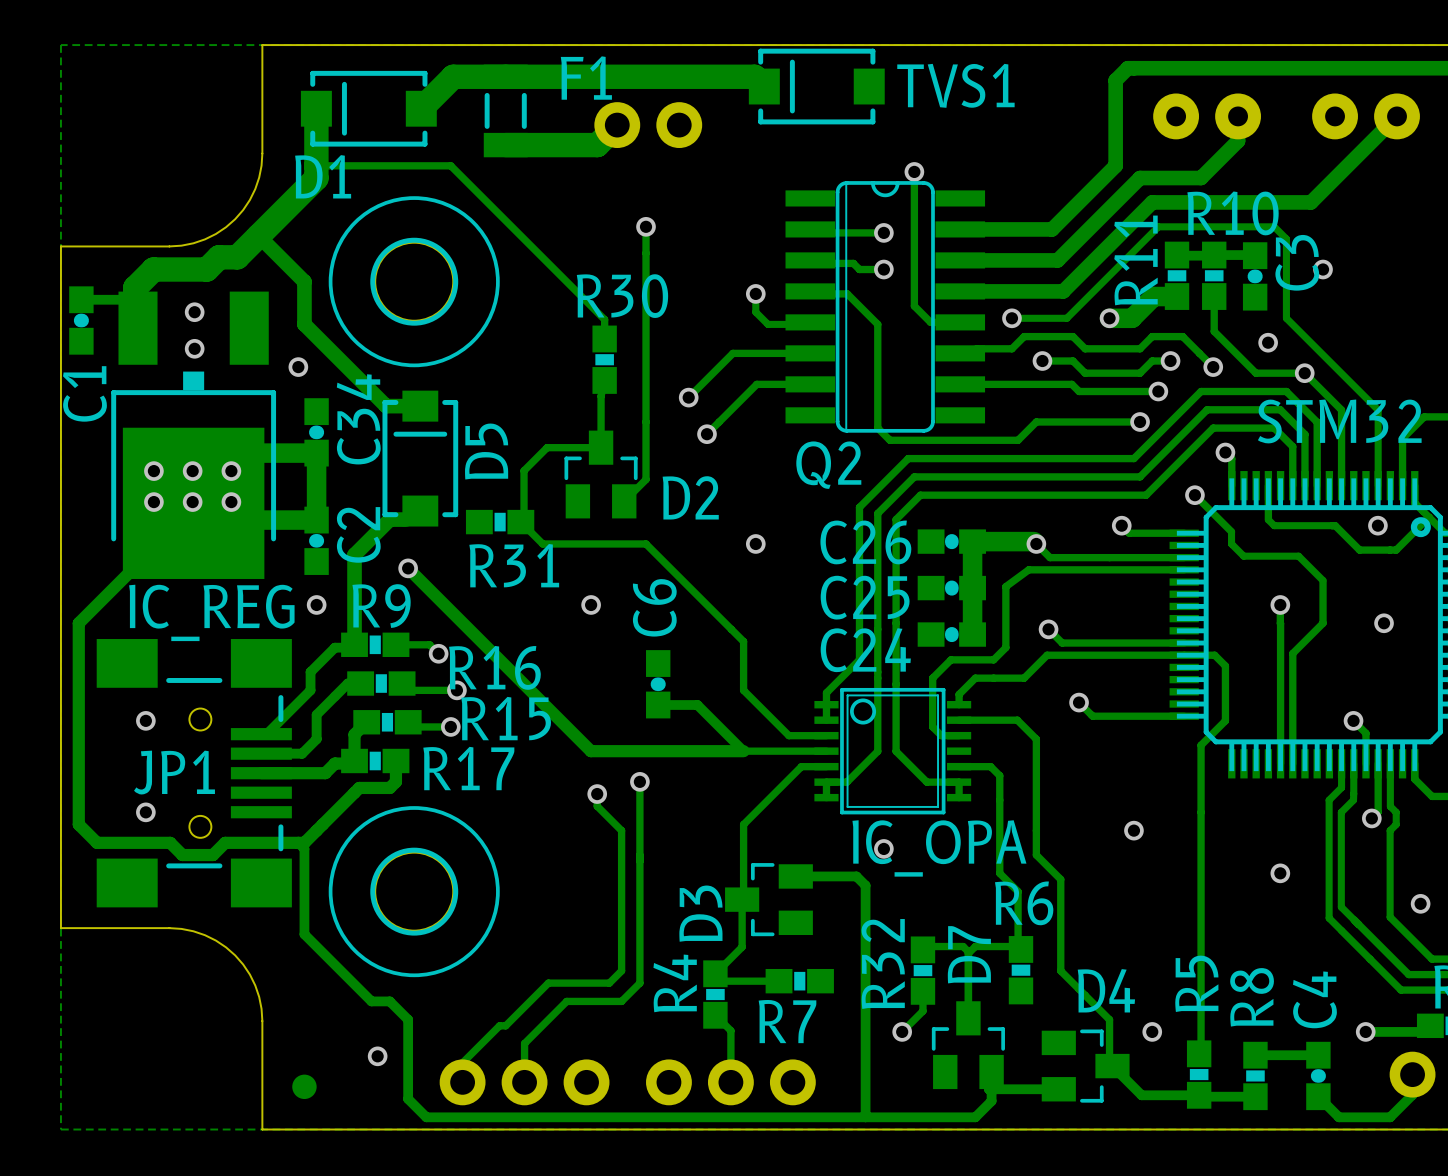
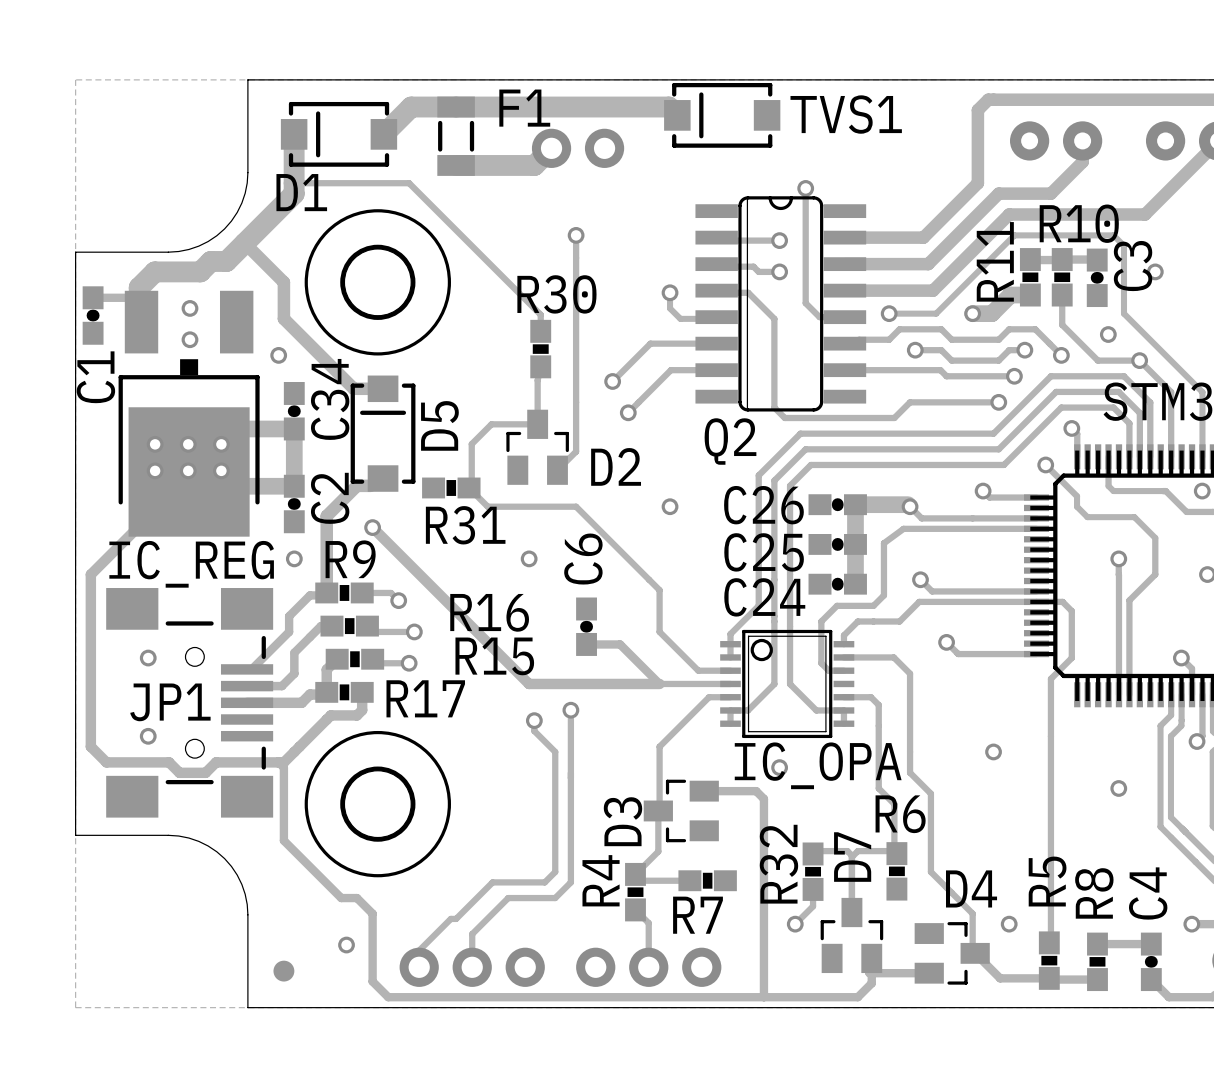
R16 name position: R16 (494, 667) -> R16 (489, 612)
R15 name position: R15 (506, 718) -> R15 (494, 656)

